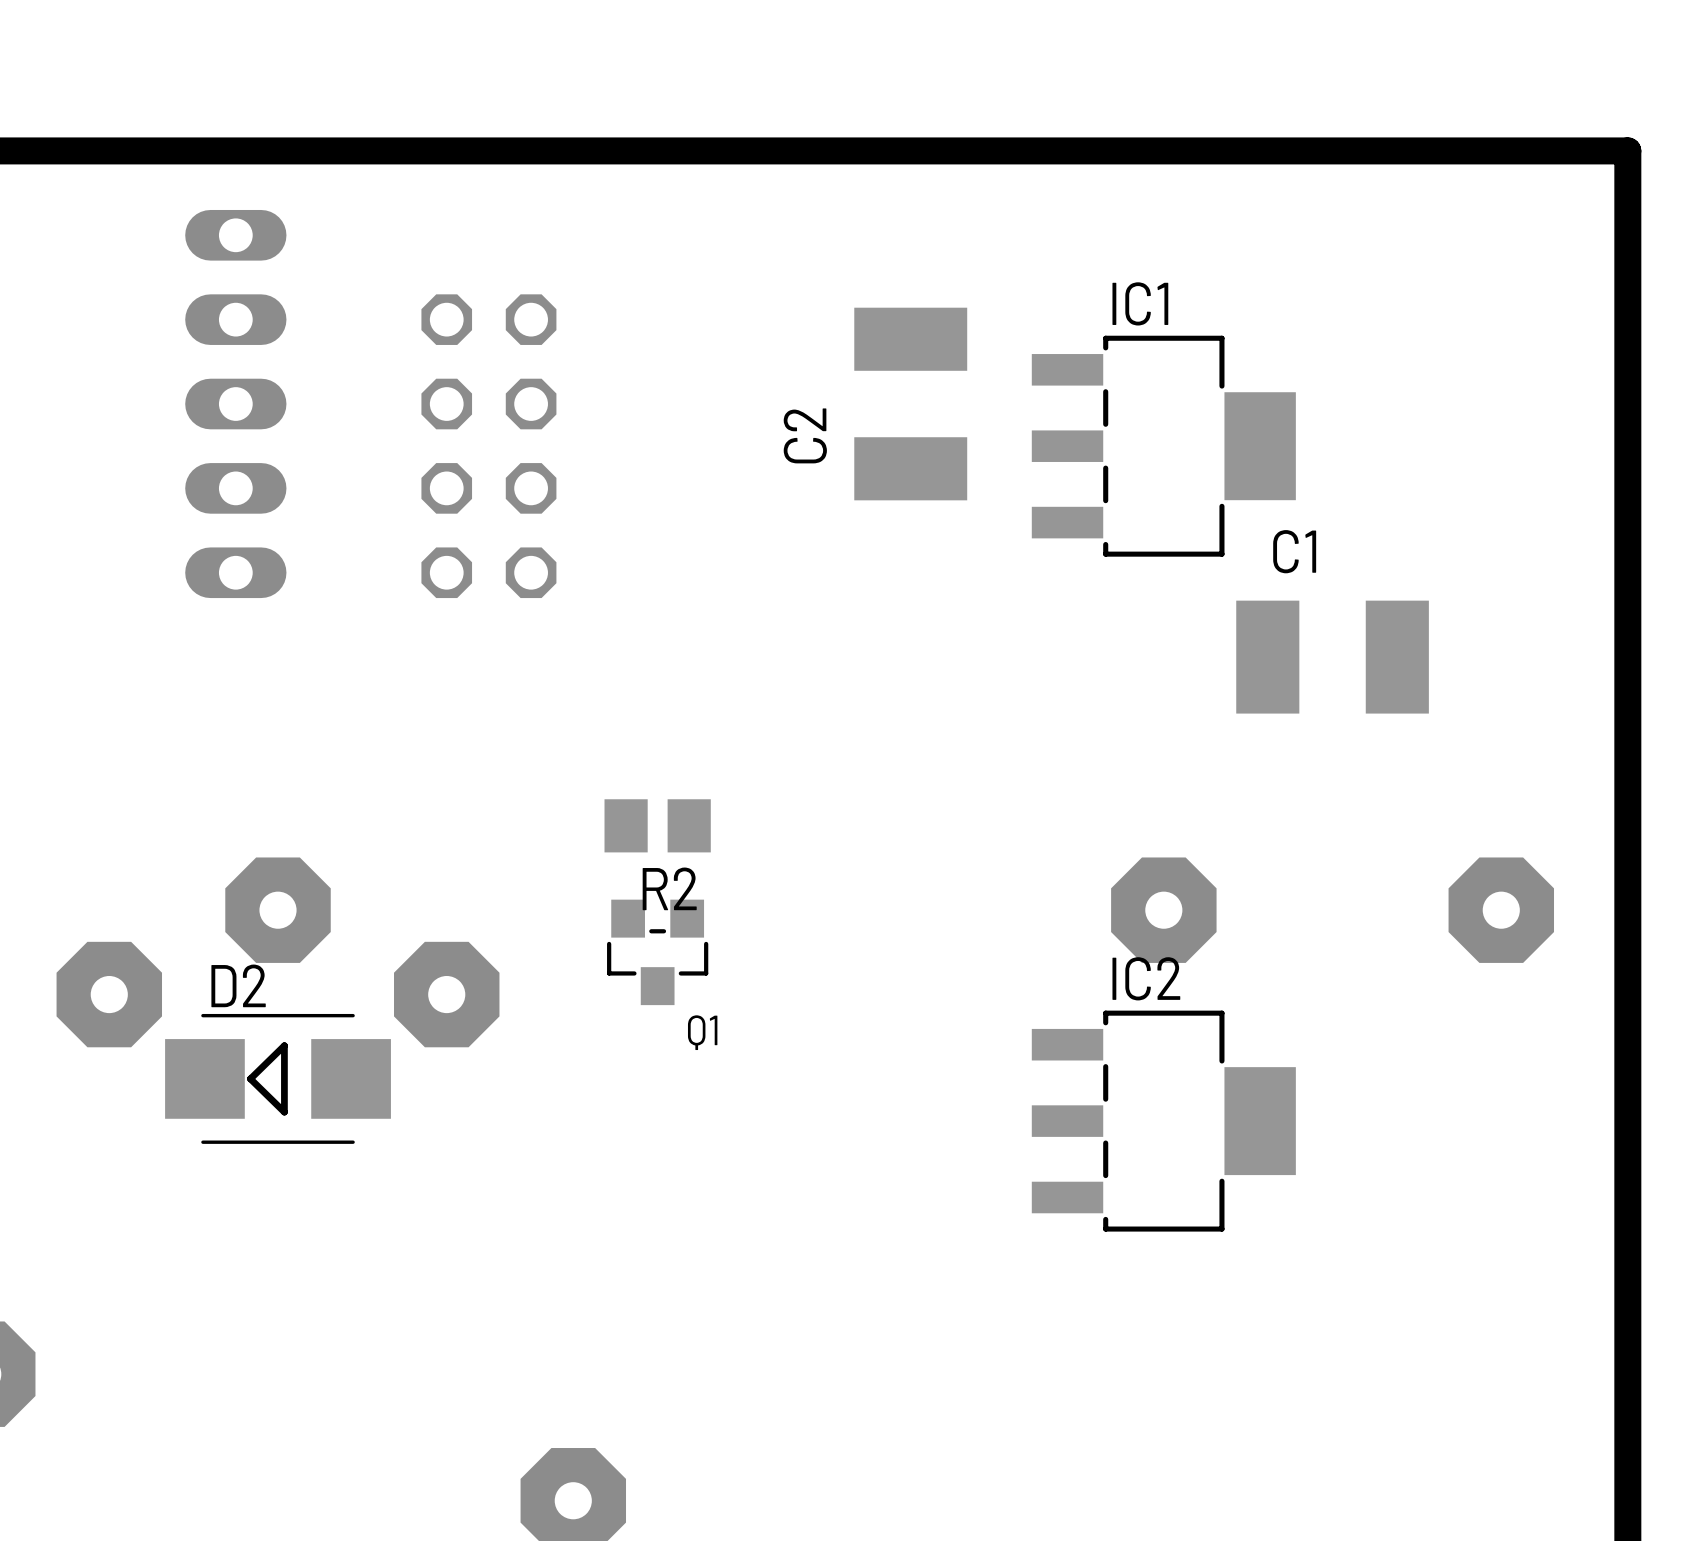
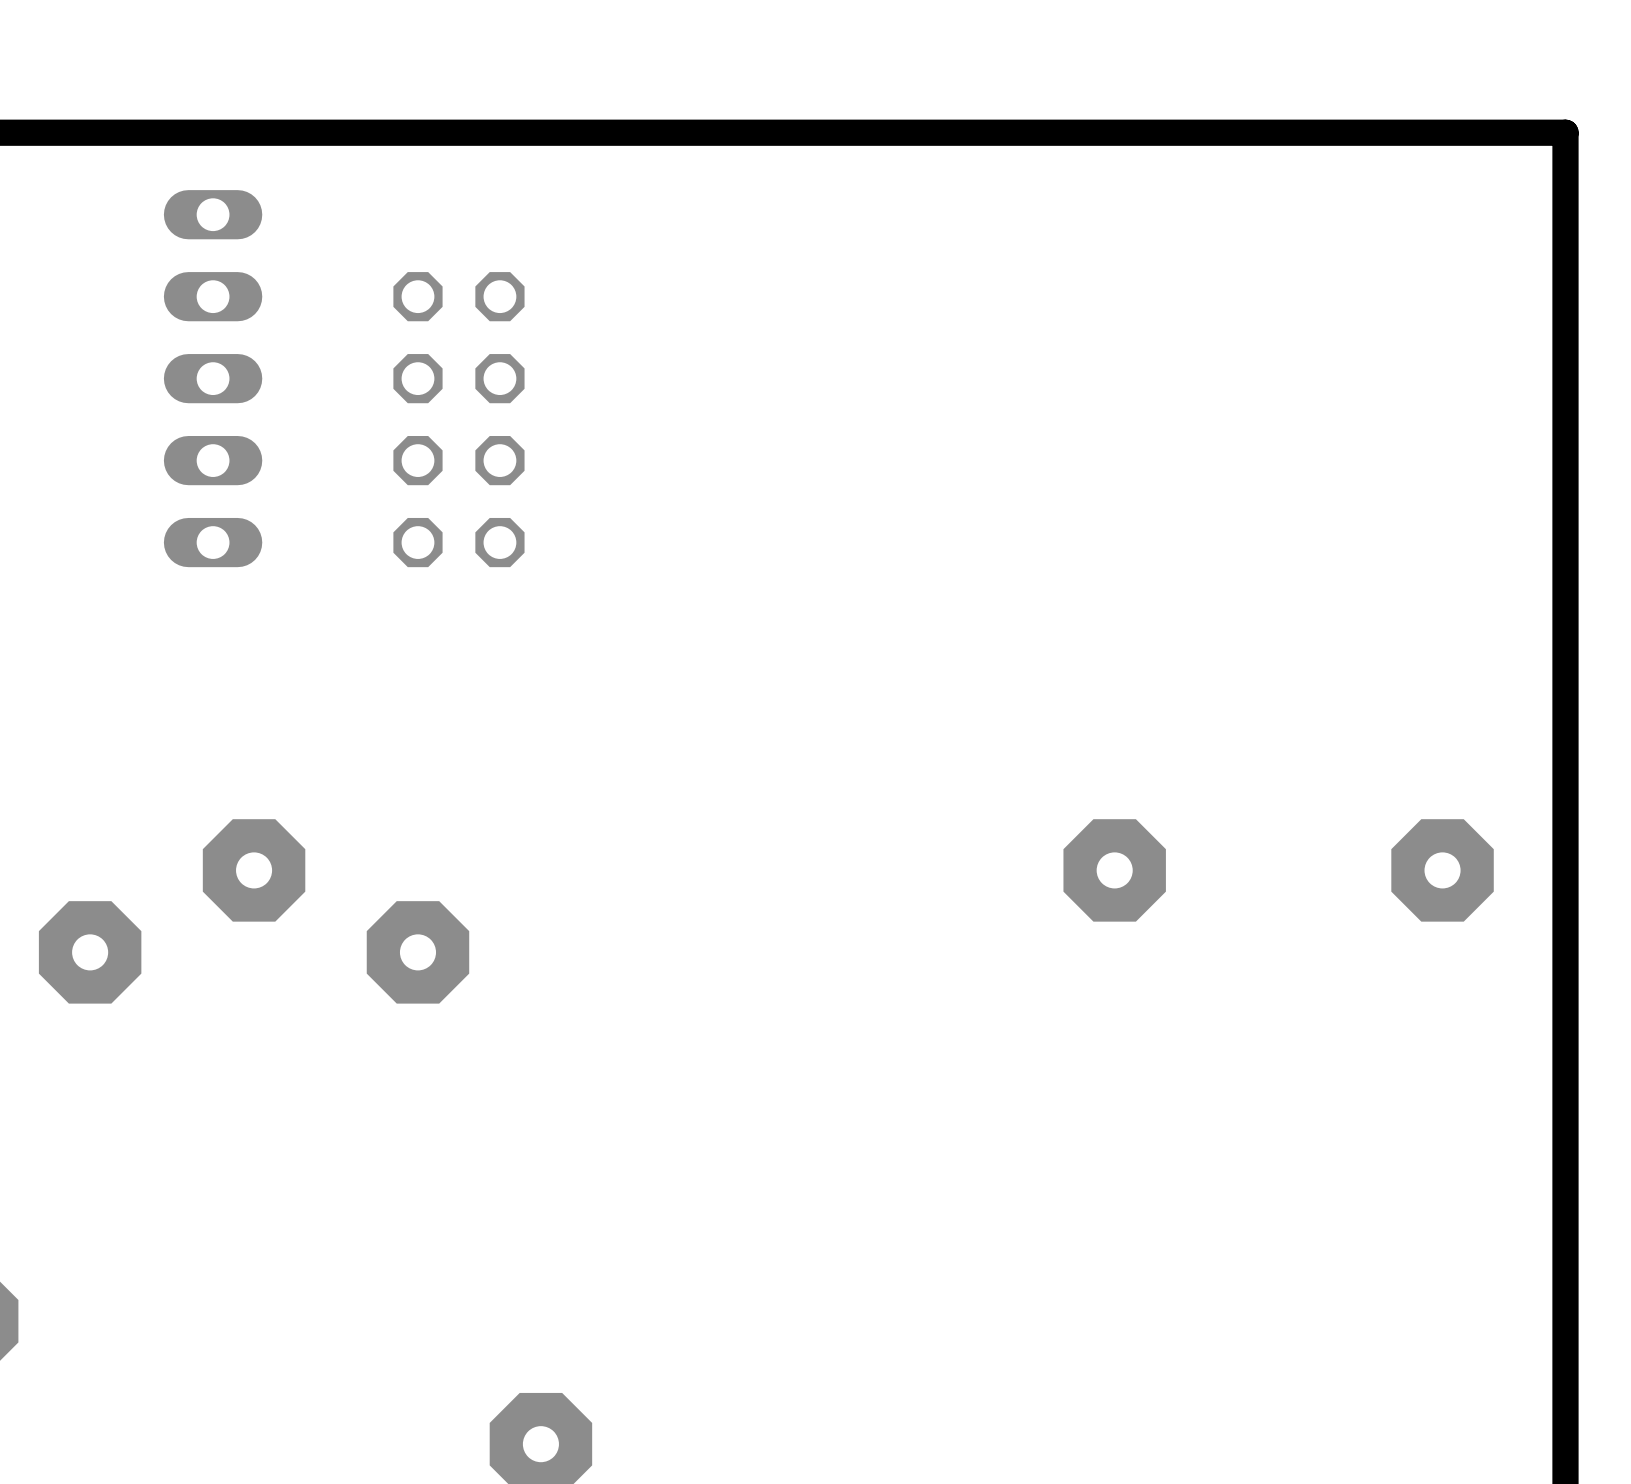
C2: (910, 404) -> none
IC1: (1163, 446) -> none
C1: (1332, 657) -> none
R2: (657, 825) -> none
Q1: (657, 952) -> none
D2: (278, 1078) -> none
IC2: (1163, 1121) -> none

